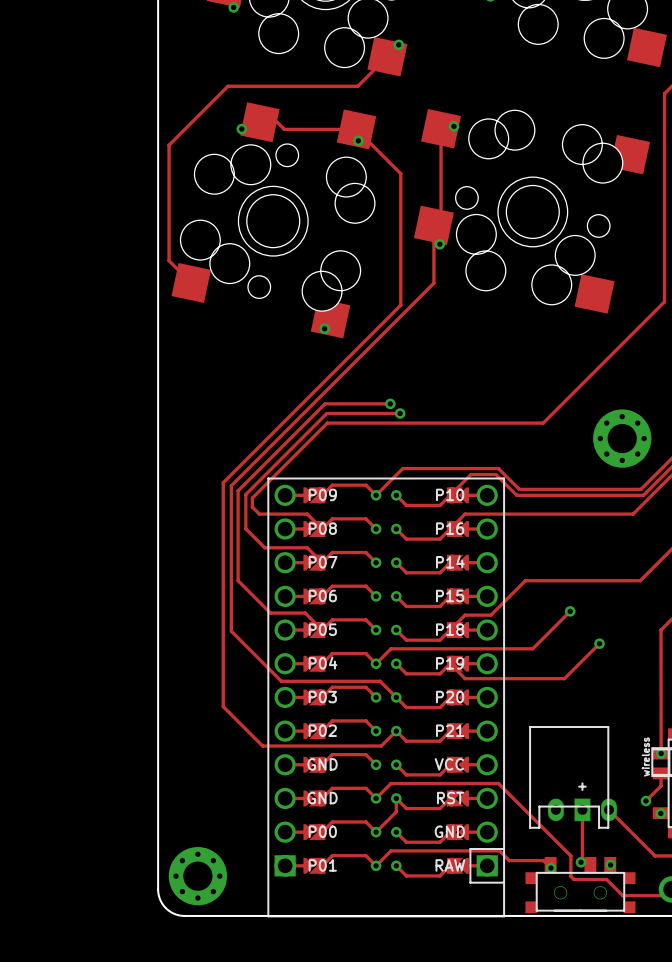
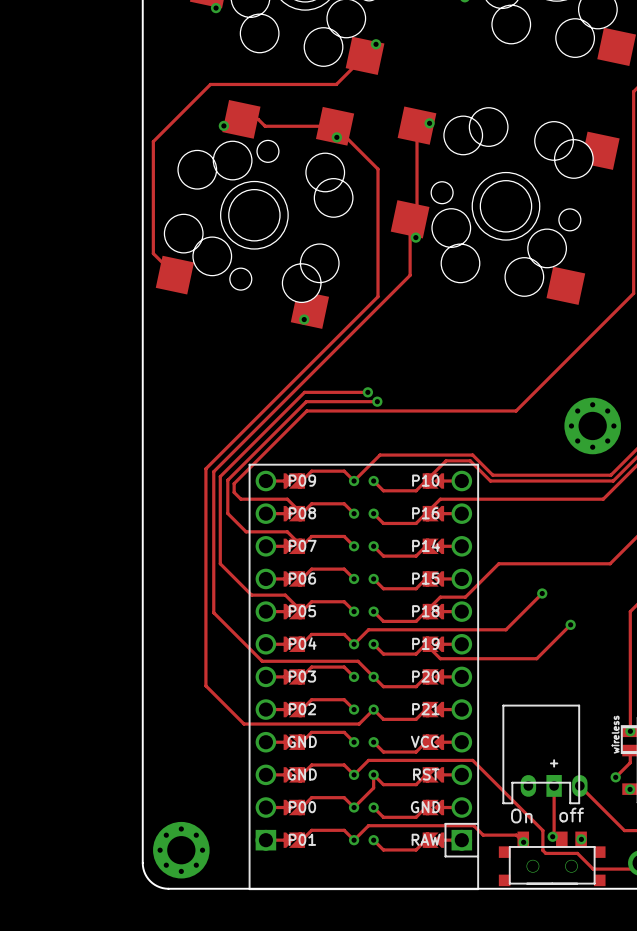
text: none -> off (571, 815)
text: none -> On (521, 816)

